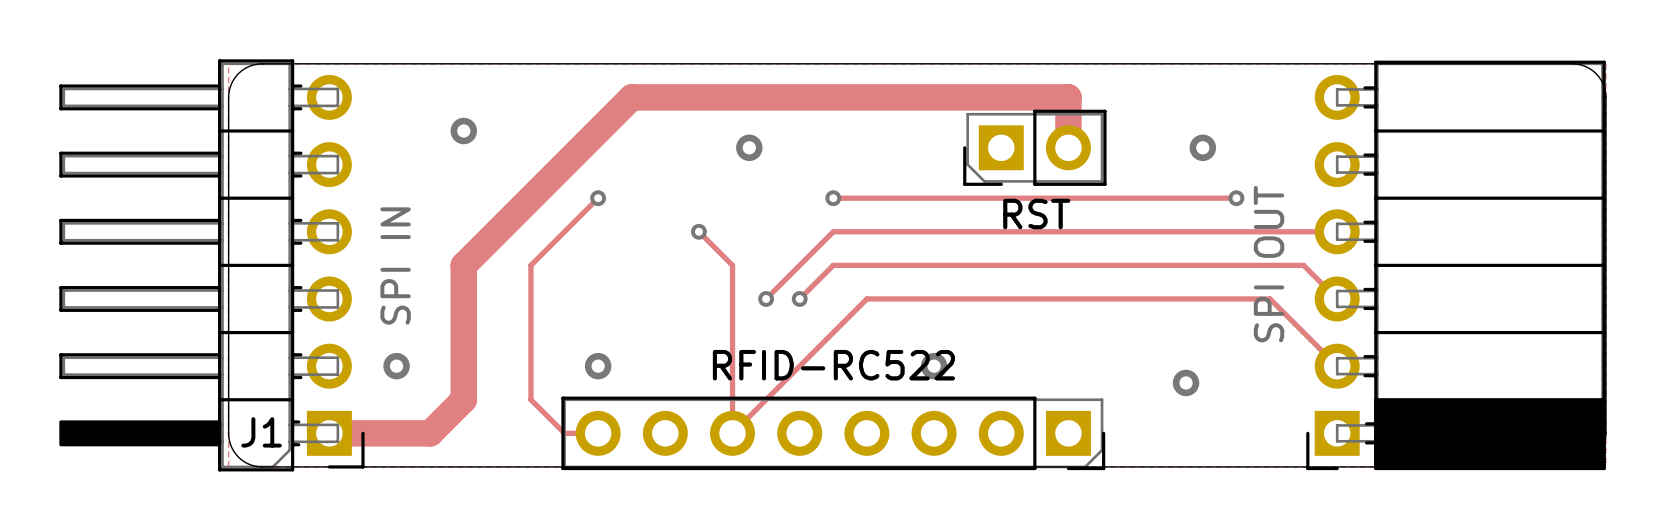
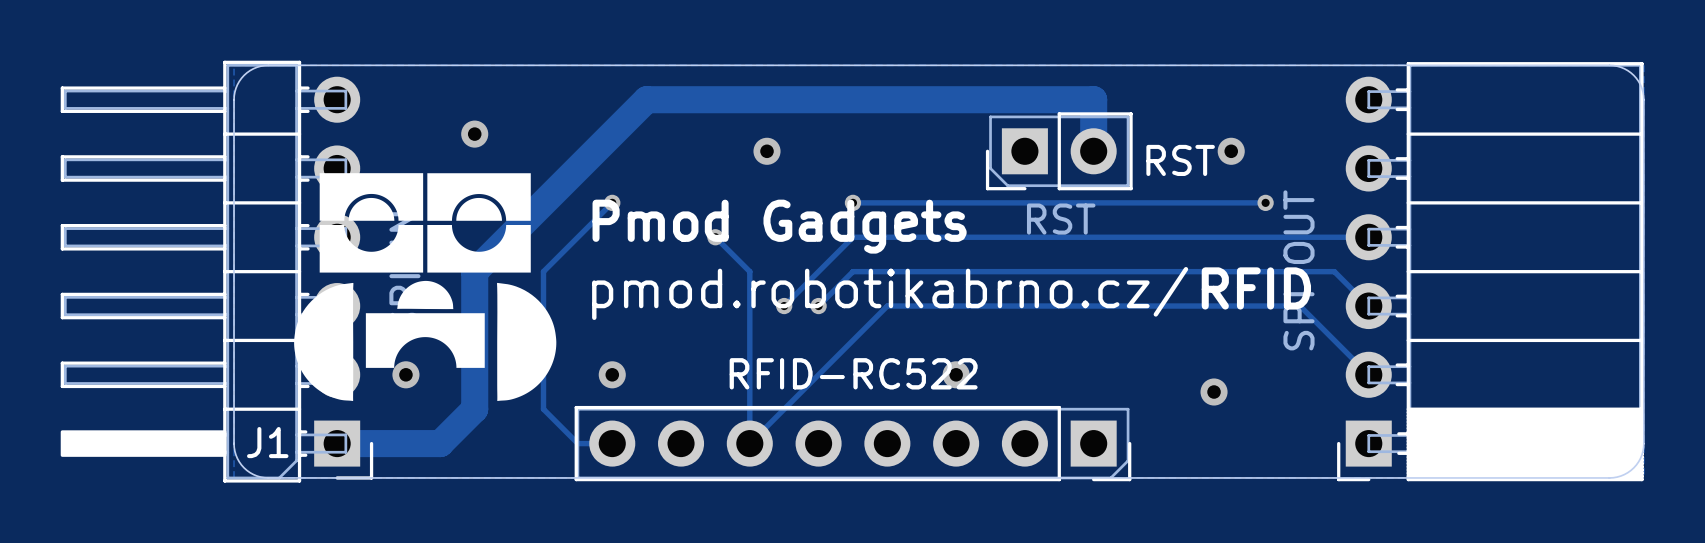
drawing: none -> [294, 173, 557, 402]
RST name position: RST (1036, 214) -> RST (1180, 160)
text: none -> Pmod Gadgets (779, 226)
text: none -> RFID (1256, 288)
text: none -> pmod.robotikabrno.cz/ (890, 293)

